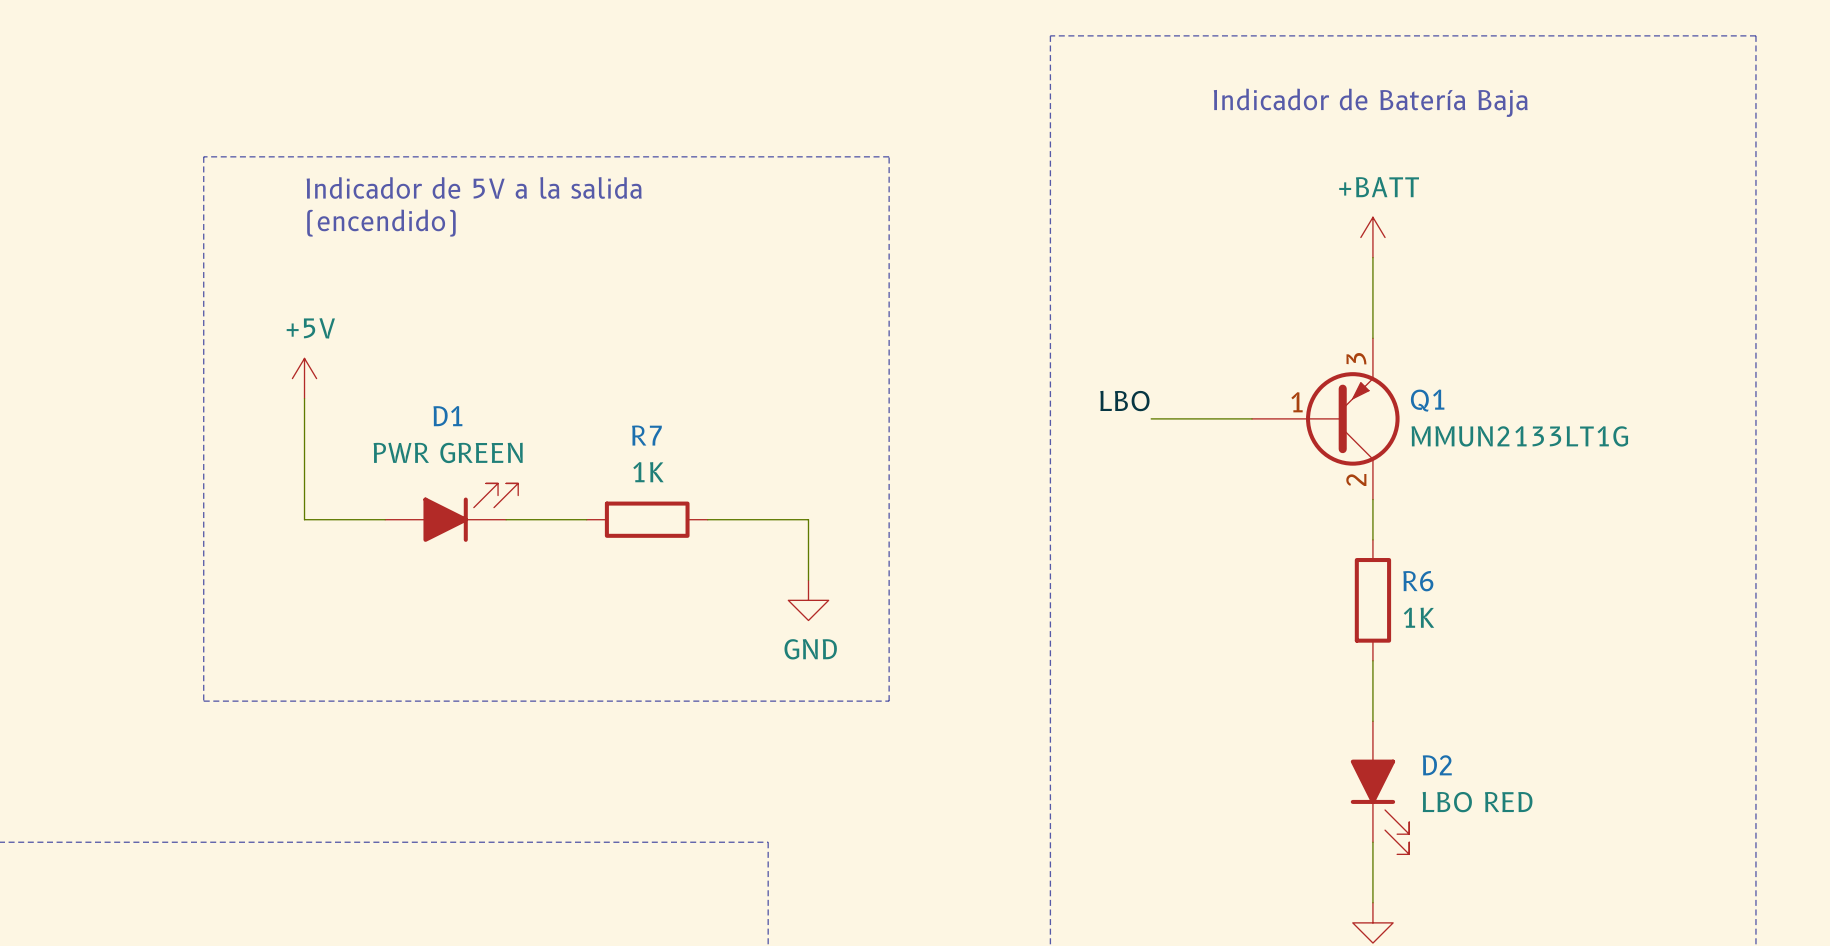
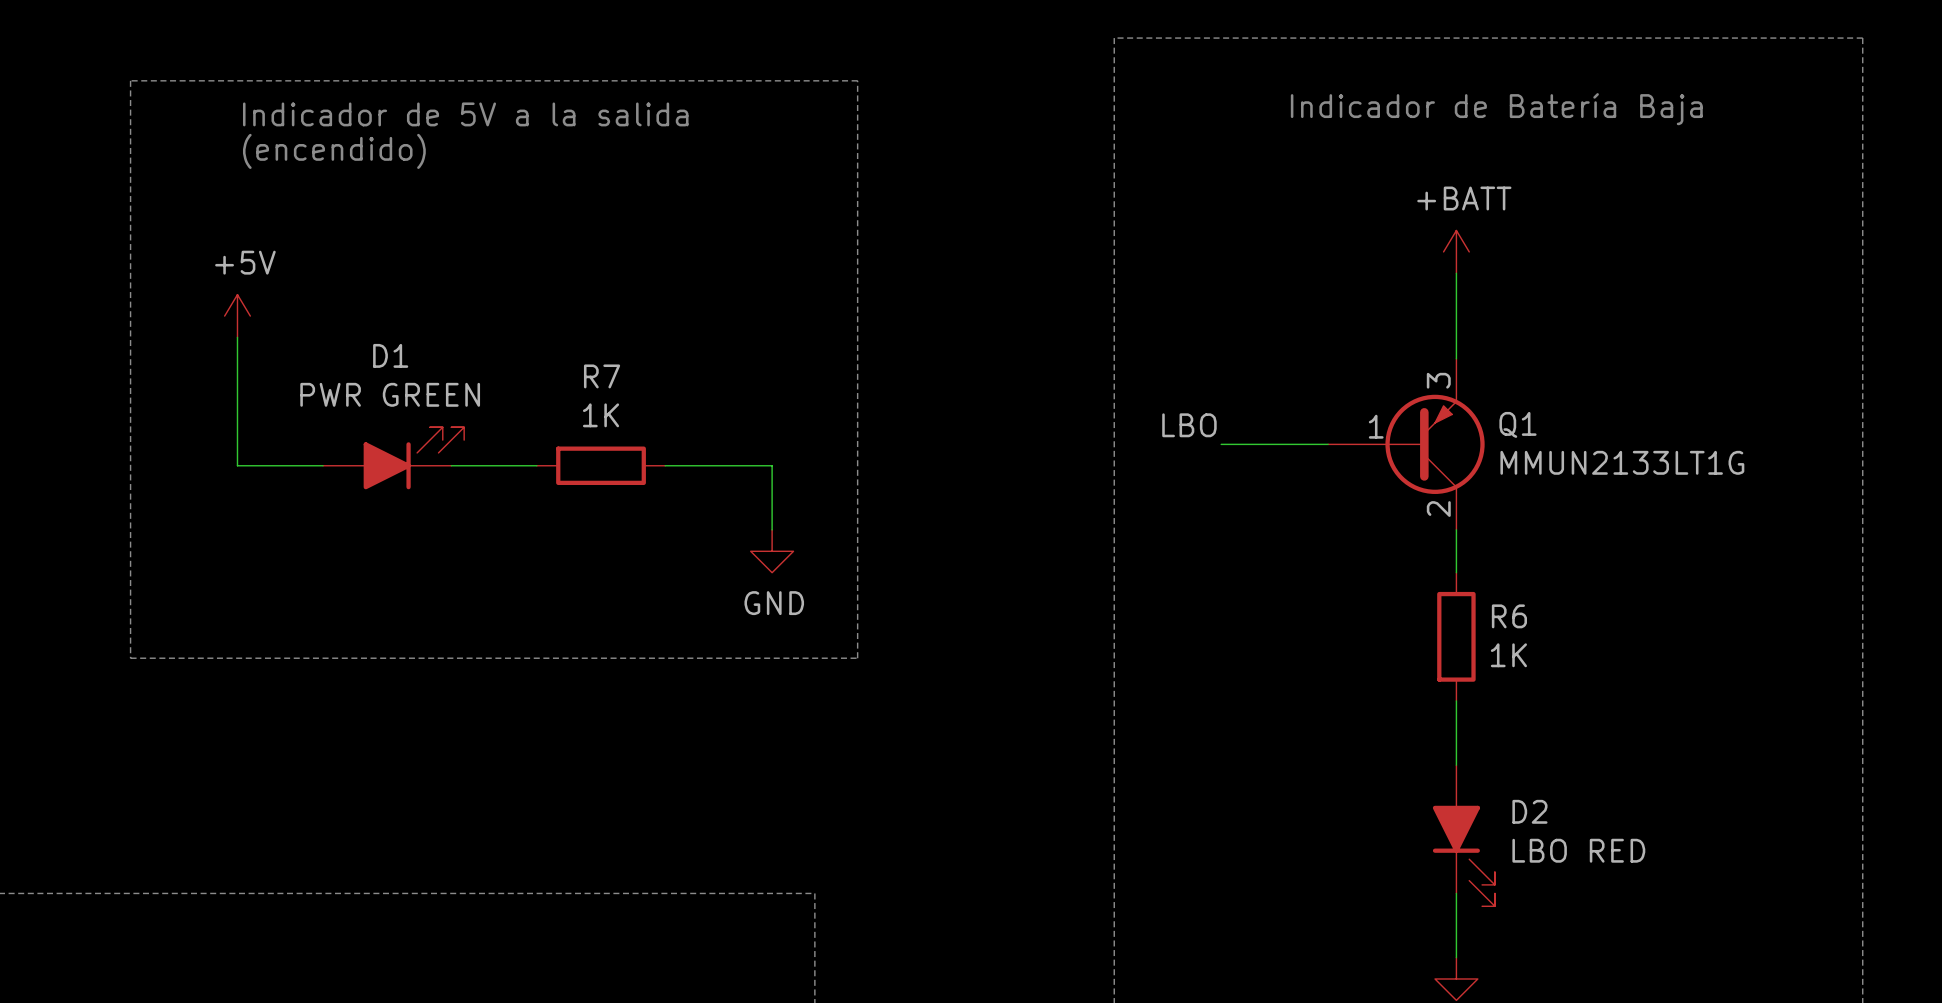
line: (203, 156) (889, 156) (889, 701) (203, 701) (203, 156) -> (130, 80) (857, 80) (857, 658) (130, 658) (130, 80)
text position: Indicador de 5V a la salida (474, 187) -> Indicador de 5V a la salida (465, 114)
text position: (encendido) (381, 223) -> (encendido) (334, 151)
power symbol position: +5V (304, 378) -> +5V (237, 316)
wire: (304, 398) (304, 519) (385, 519) -> (237, 337) (237, 465) (323, 465)
D1 position: (451, 512) -> (393, 458)
wire: (506, 519) (586, 519) -> (451, 465) (536, 465)
R7 position: (647, 519) -> (601, 465)
wire: (707, 519) (808, 519) (808, 580) -> (665, 465) (772, 465) (772, 529)
power symbol position: GND (808, 600) -> GND (772, 551)

